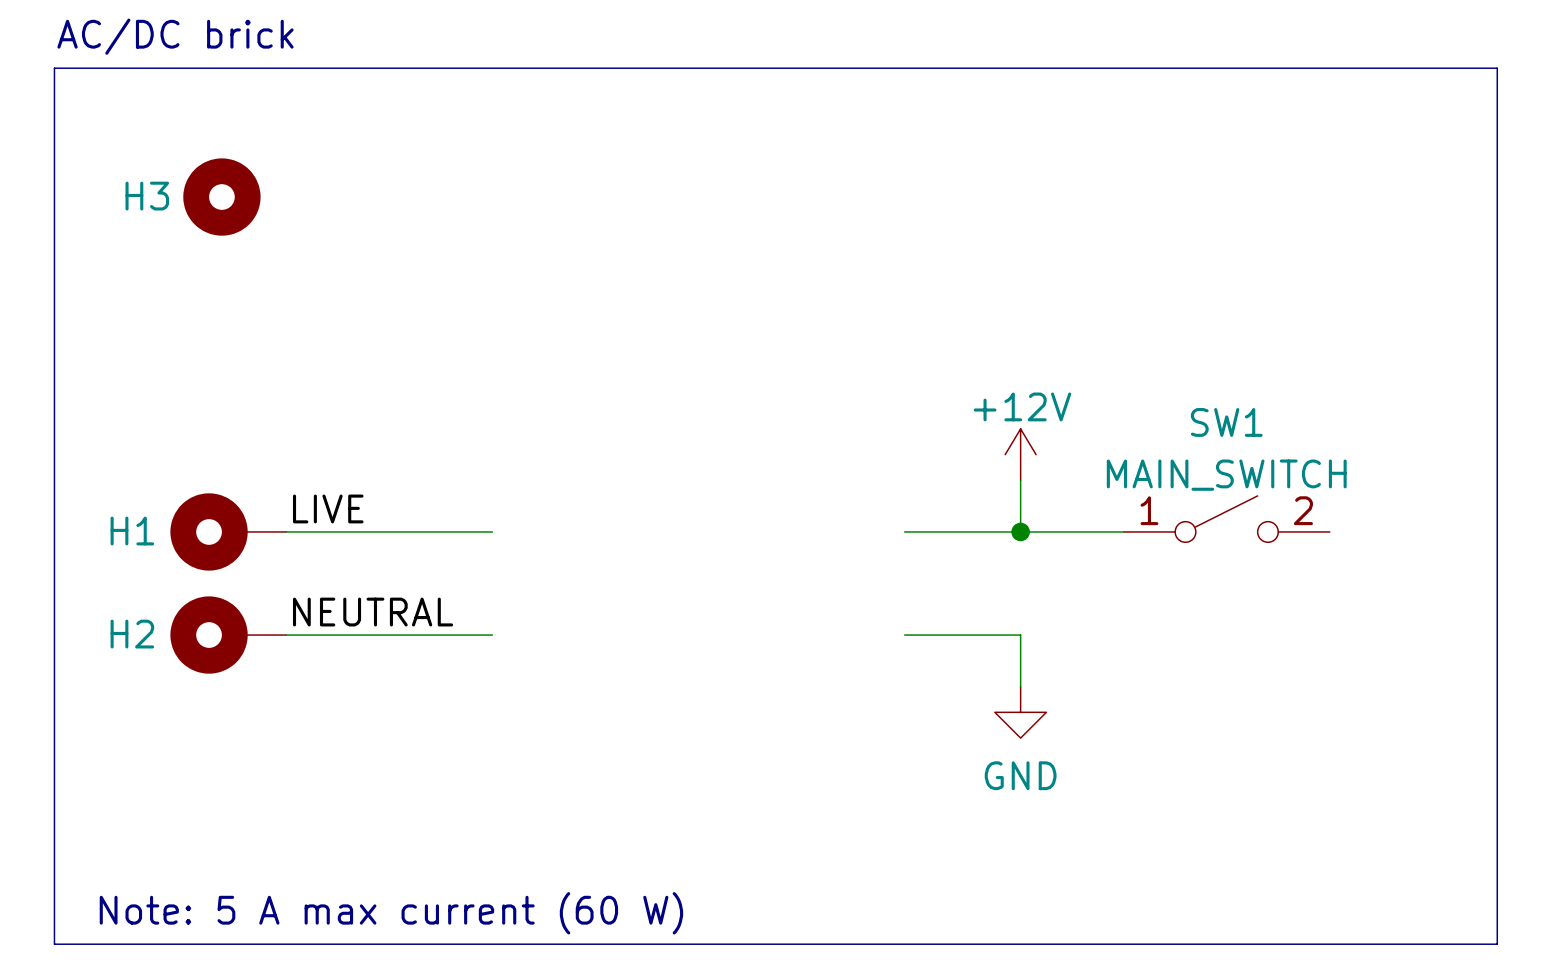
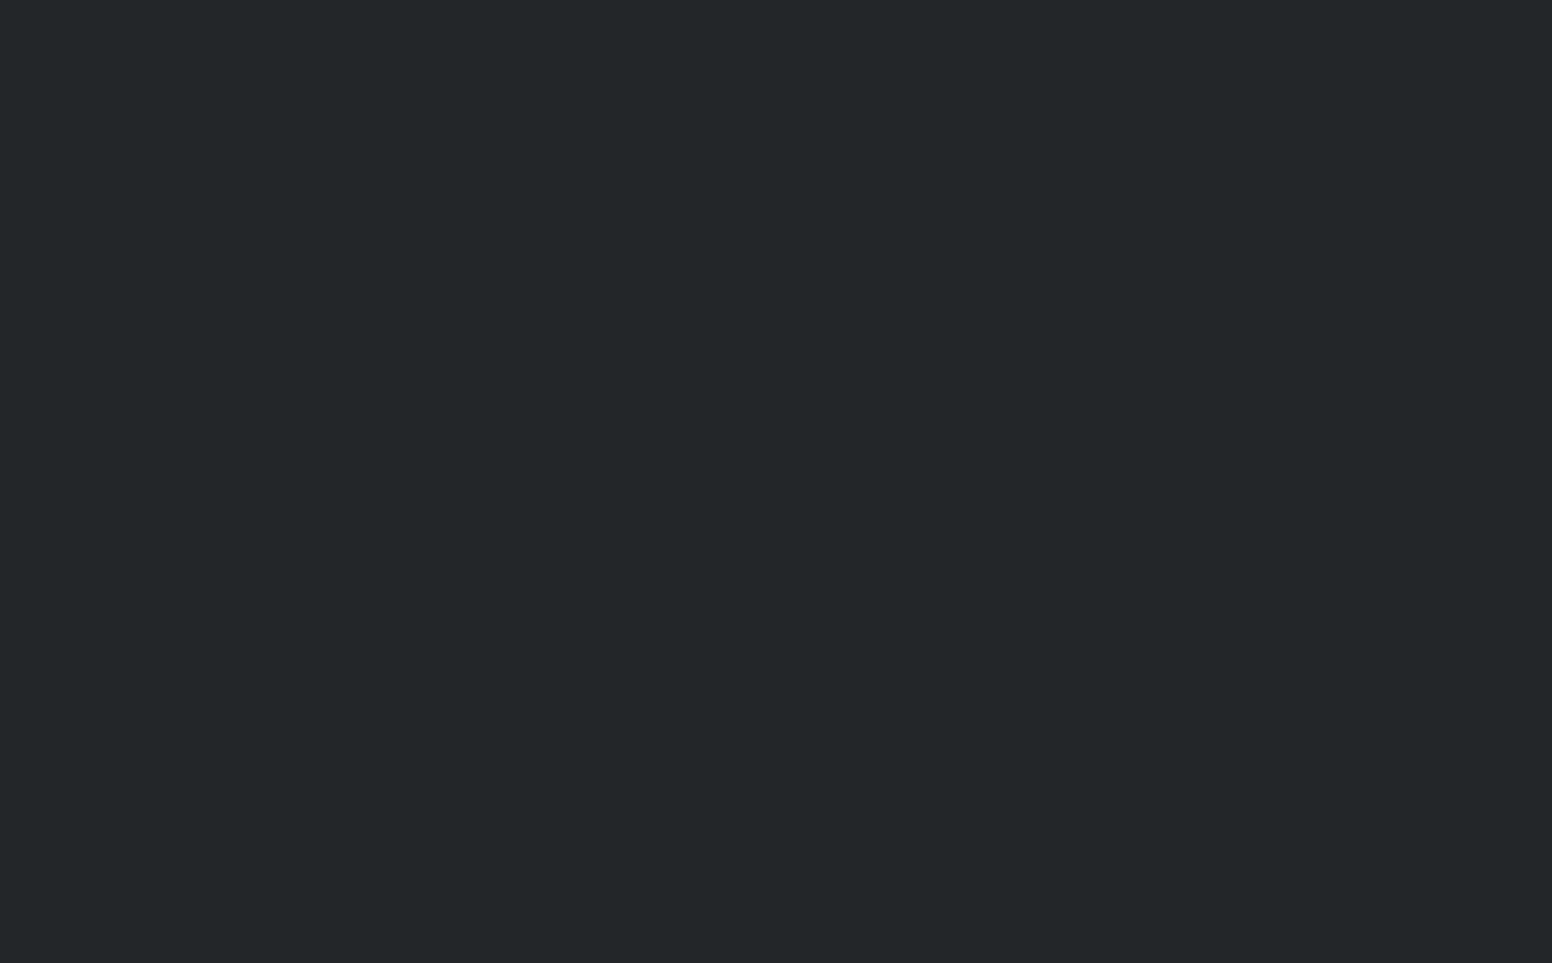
text: AC/DC brick (175, 36) -> none
line: (54, 68) (54, 944) (1497, 944) (1497, 68) (54, 68) -> none
H3: (221, 197) -> none
power symbol: +12V (1020, 454) -> none
wire: (1020, 480) (1020, 531) -> none
label: LIVE (328, 508) -> none
SW1: MAIN_SWITCH (1226, 519) -> none
H1: (228, 531) -> none
wire: (286, 531) (492, 531) -> none
wire: (904, 531) (1123, 531) -> none
junction: (1020, 531) -> none
label: NEUTRAL (373, 612) -> none
H2: (228, 635) -> none
wire: (286, 635) (492, 635) -> none
wire: (904, 635) (1020, 635) (1020, 686) -> none
power symbol: GND (1020, 712) -> none
text: Note: 5 A max current (60 W) (391, 913) -> none

